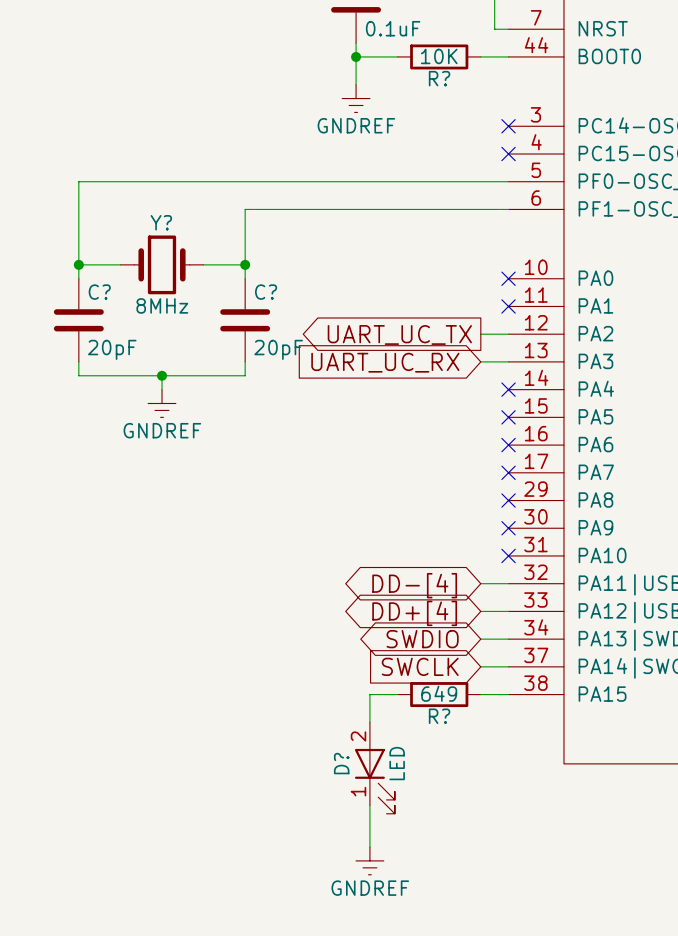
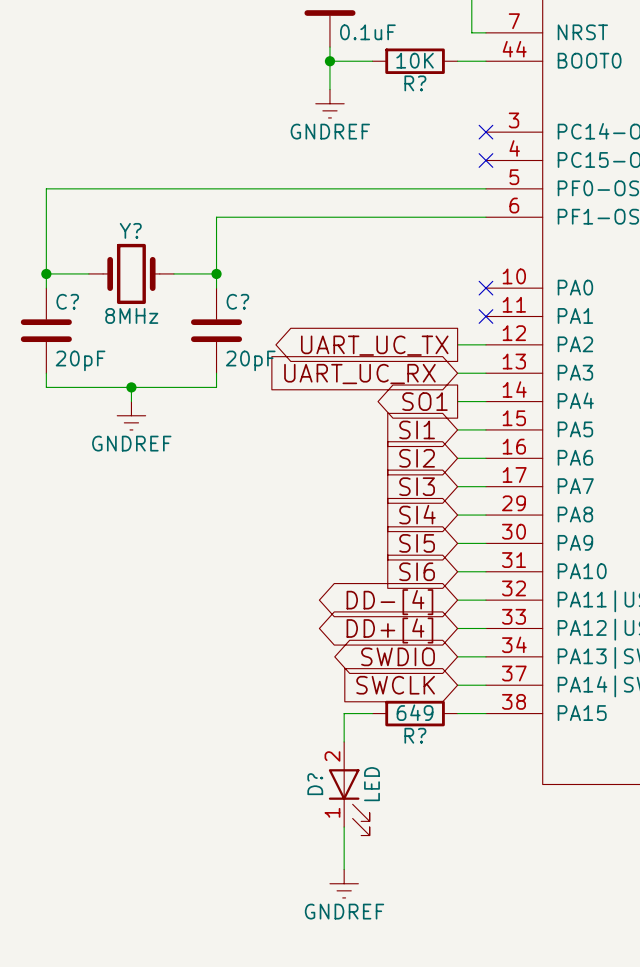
global label: none -> SO1 (424, 401)
wire: none -> (457, 401) (485, 401)
no-connect mark: (508, 389) -> none
global label: none -> SI1 (417, 429)
wire: none -> (457, 429) (485, 429)
no-connect mark: (508, 417) -> none
global label: none -> SI2 (417, 458)
wire: none -> (457, 458) (485, 458)
no-connect mark: (508, 445) -> none
global label: none -> SI3 (417, 486)
wire: none -> (457, 486) (485, 486)
no-connect mark: (508, 472) -> none
global label: none -> SI4 (417, 514)
wire: none -> (457, 515) (485, 515)
no-connect mark: (508, 500) -> none
global label: none -> SI5 (417, 543)
wire: none -> (457, 543) (485, 543)
no-connect mark: (508, 528) -> none
global label: none -> SI6 (417, 571)
wire: none -> (457, 571) (485, 571)
no-connect mark: (508, 555) -> none

